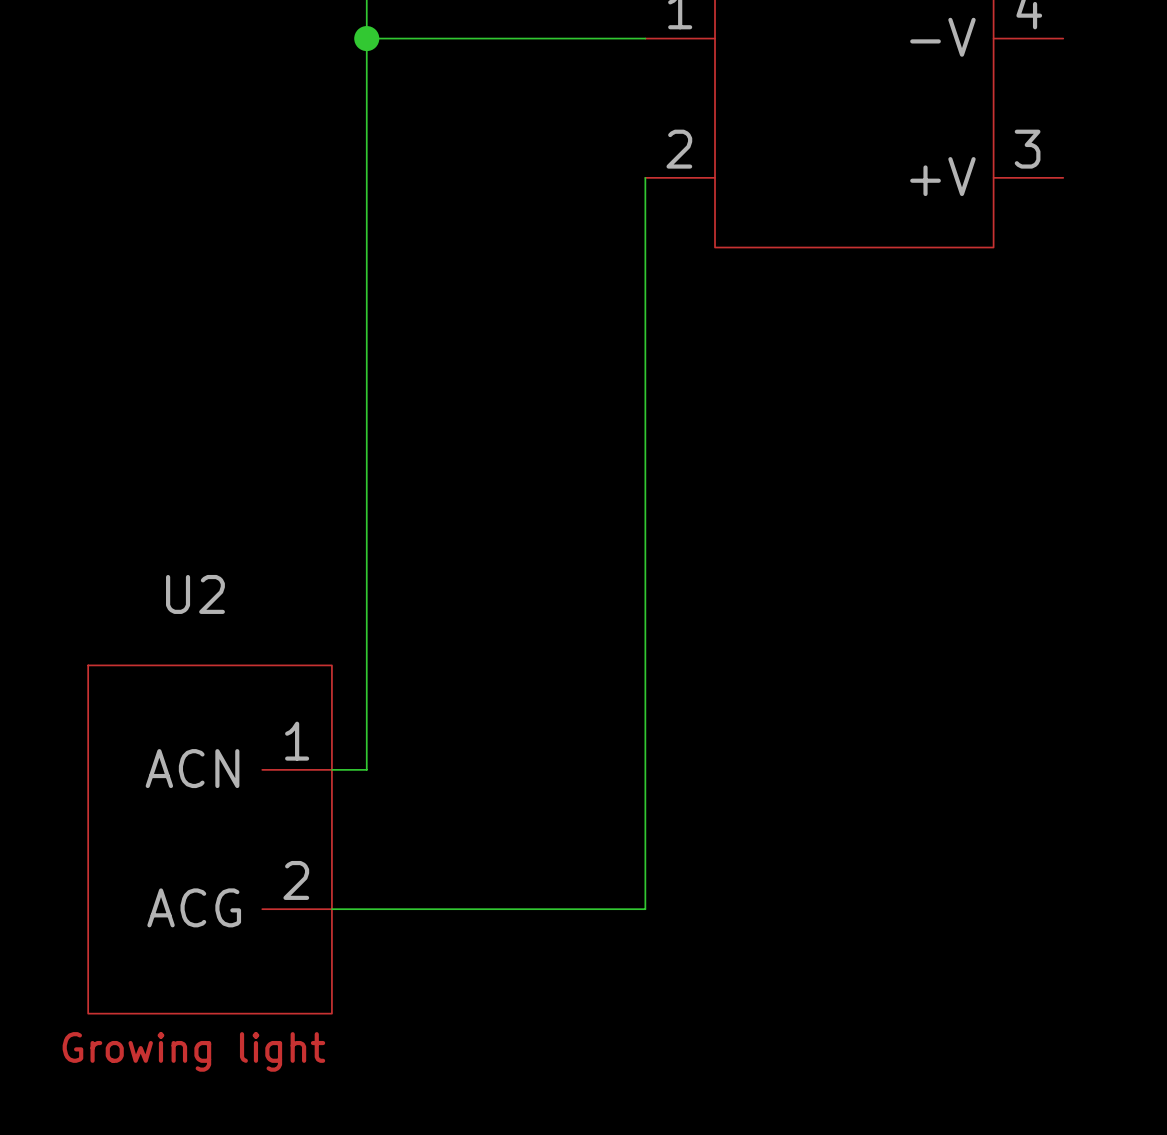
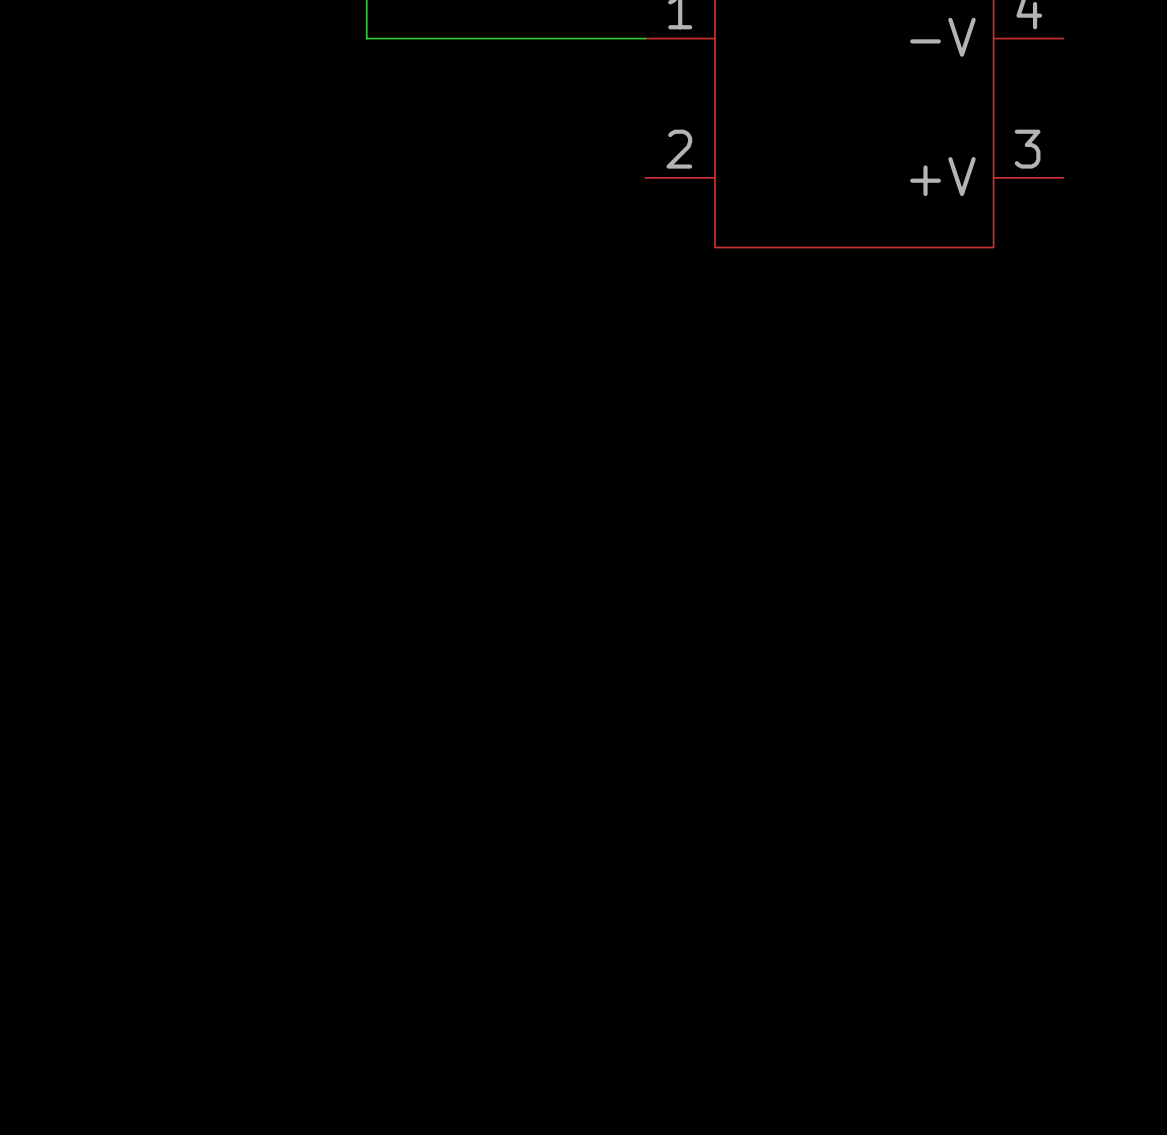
wire: (366, 38) (366, 769) (331, 769) -> none
junction: (366, 38) -> none
wire: (645, 177) (645, 909) (331, 909) -> none
U2: (210, 839) -> none

